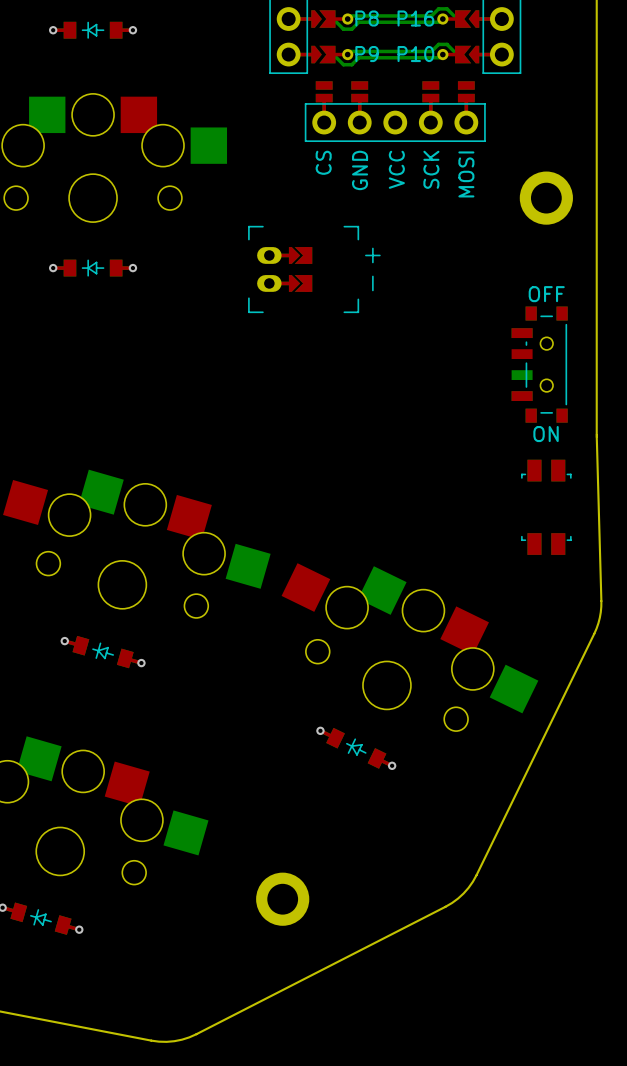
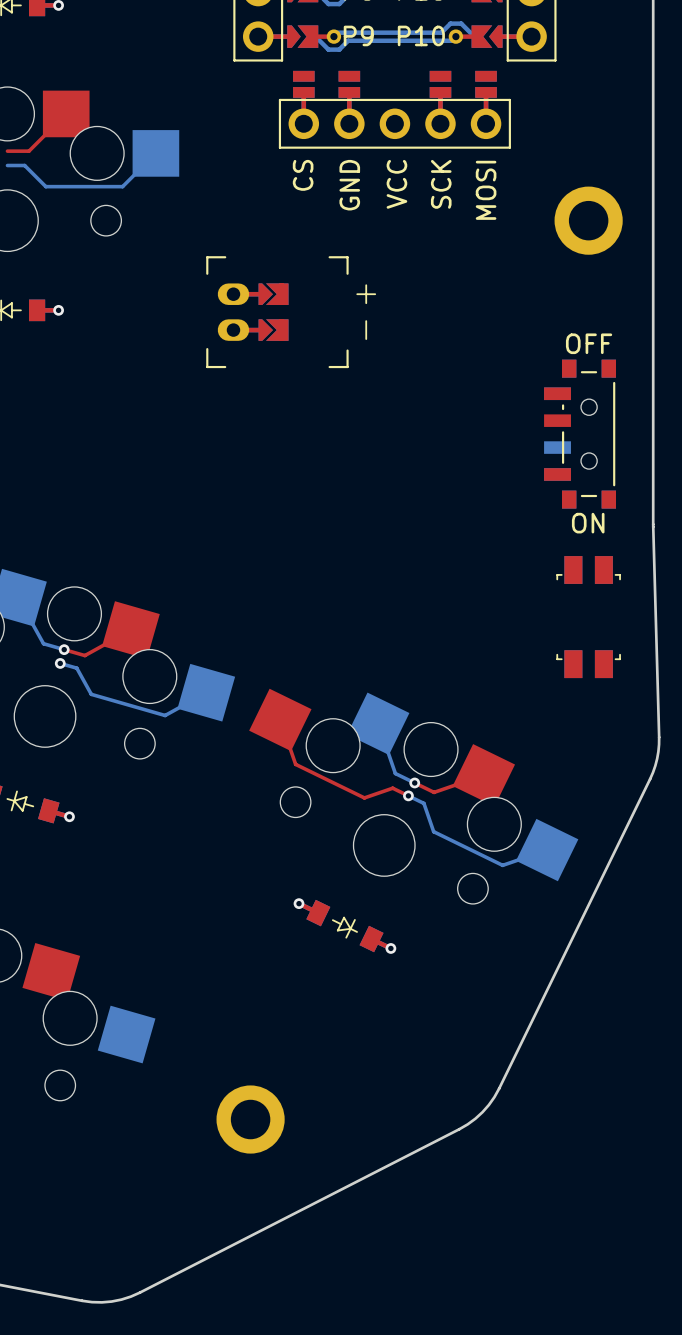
top track: none -> (66, 113) (28, 151) (7, 151)
bottom track: none -> (155, 153) (122, 186) (45, 186) (24, 165) (7, 165)
bottom track: none -> (18, 597) (43, 643) (64, 649)
top track: none -> (130, 630) (84, 655) (64, 649)
via: none -> (64, 649)
bottom track: none -> (60, 663) (76, 668) (91, 694) (165, 715) (206, 692)
via: none -> (60, 663)
top track: none -> (280, 719) (295, 764) (364, 797) (392, 788) (408, 795)
bottom track: none -> (378, 723) (395, 773) (414, 782)
top track: none -> (483, 775) (434, 792) (414, 782)
via: none -> (414, 782)
bottom track: none -> (408, 795) (423, 803) (433, 831) (502, 865) (547, 850)
via: none -> (408, 795)
part rotation: 0° (356, 748) -> 180° (344, 926)

